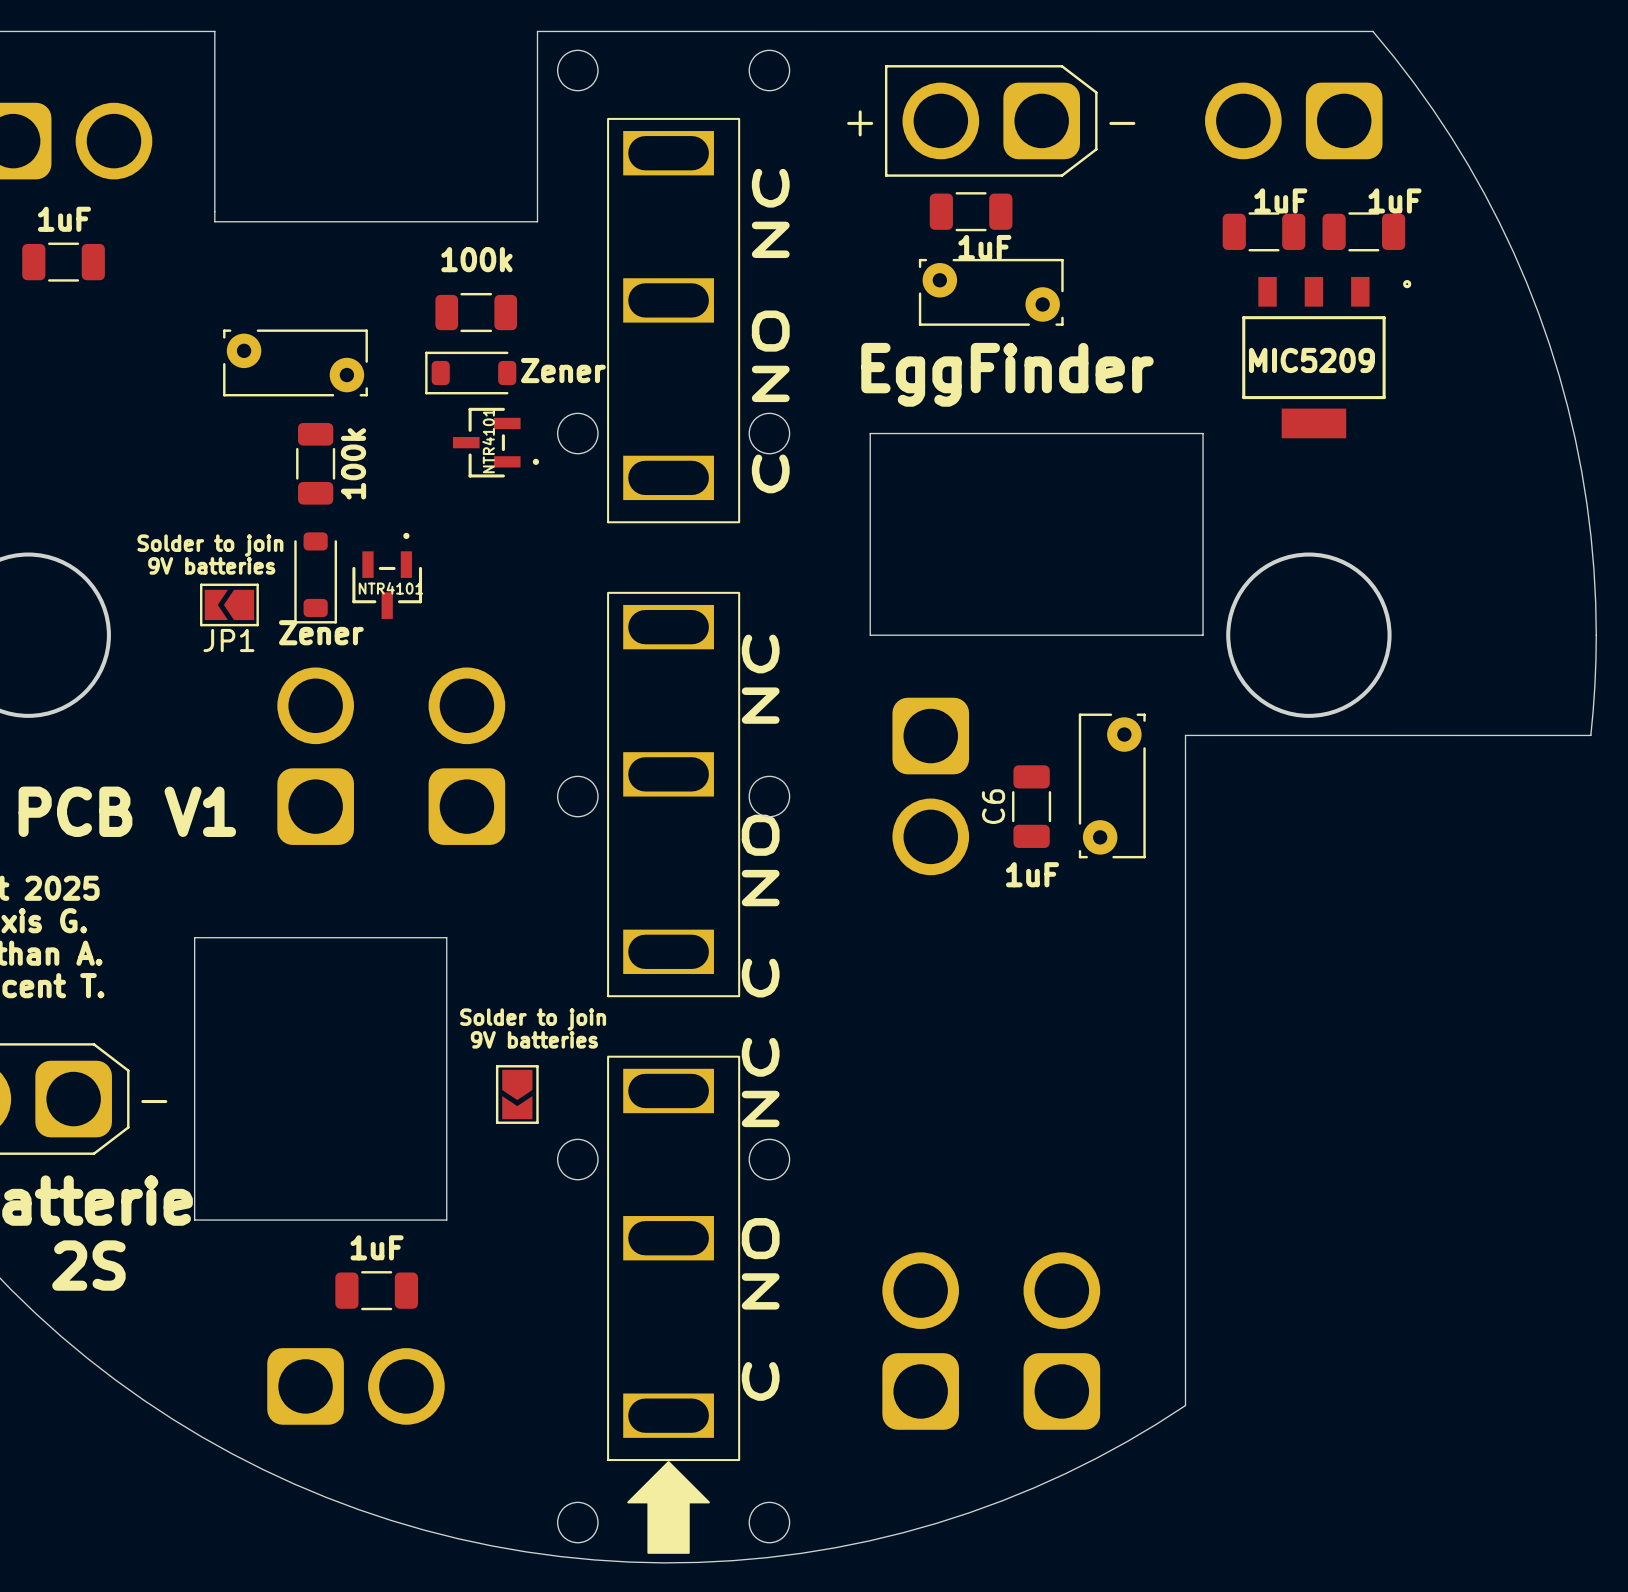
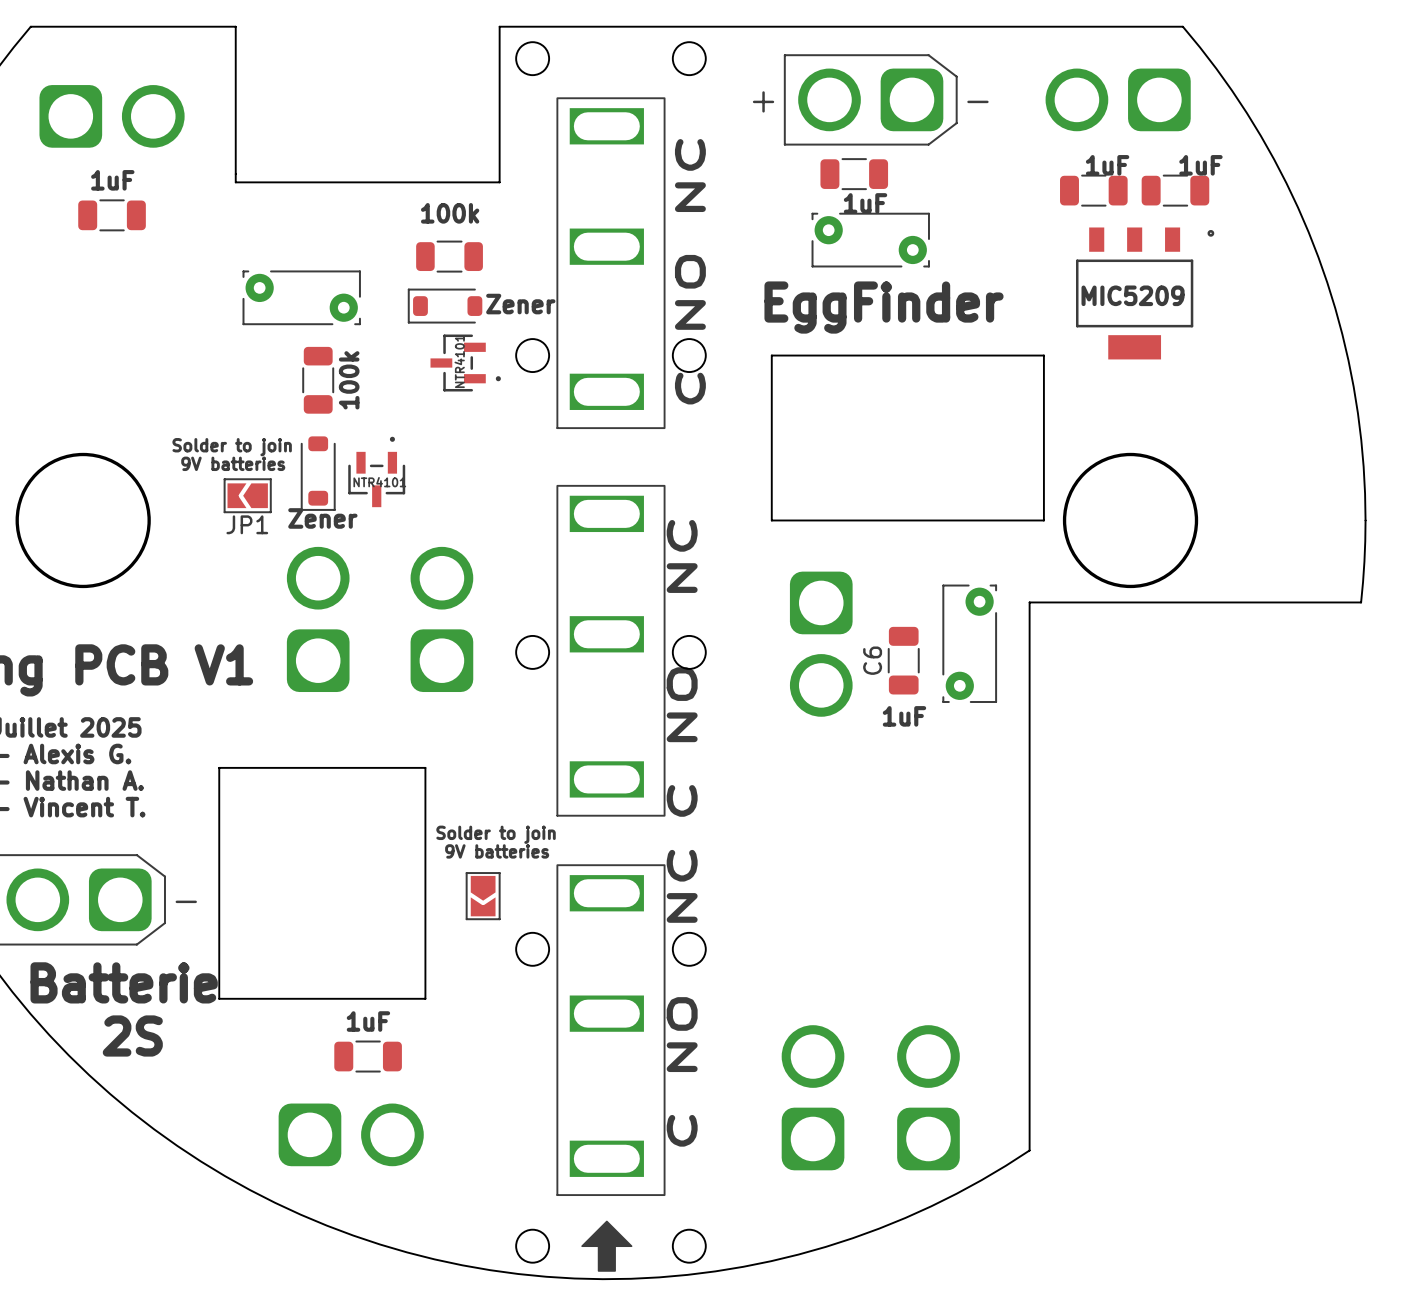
drawing shape: [627, 1461, 710, 1554] -> [581, 1220, 633, 1272]

